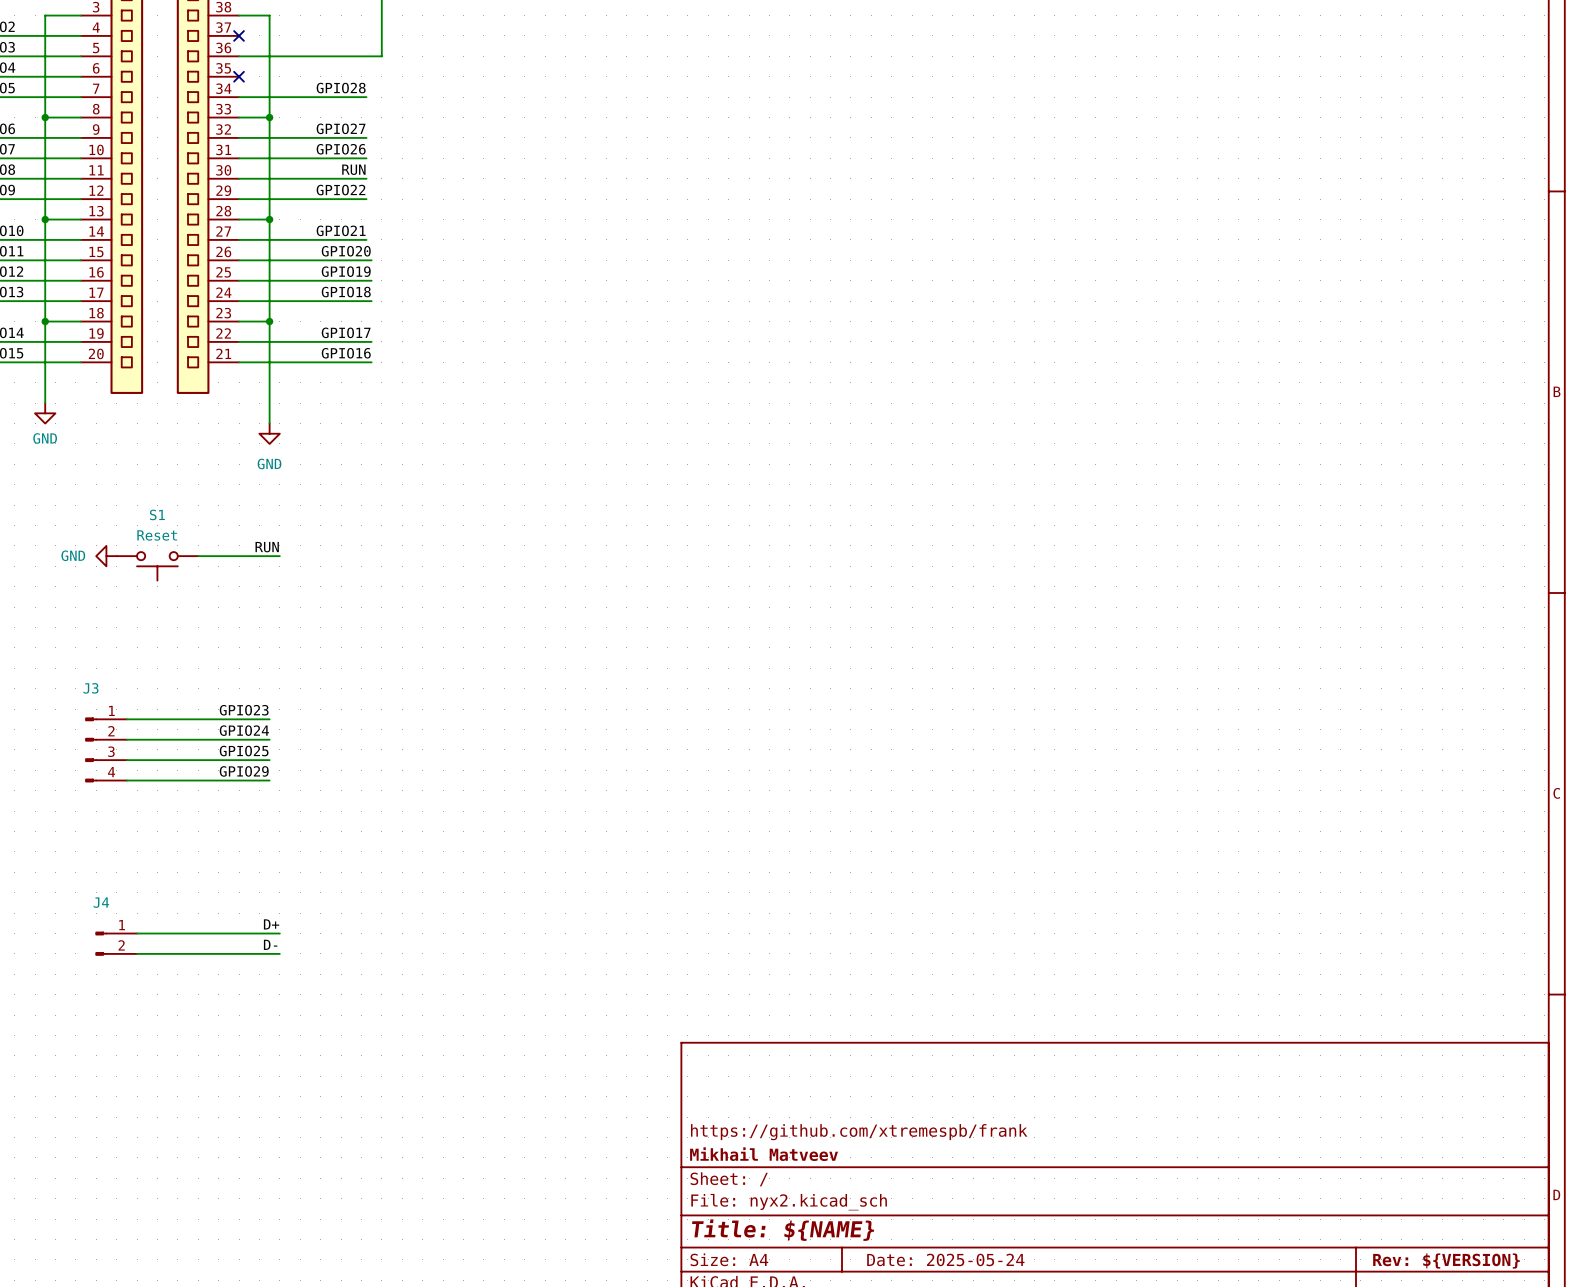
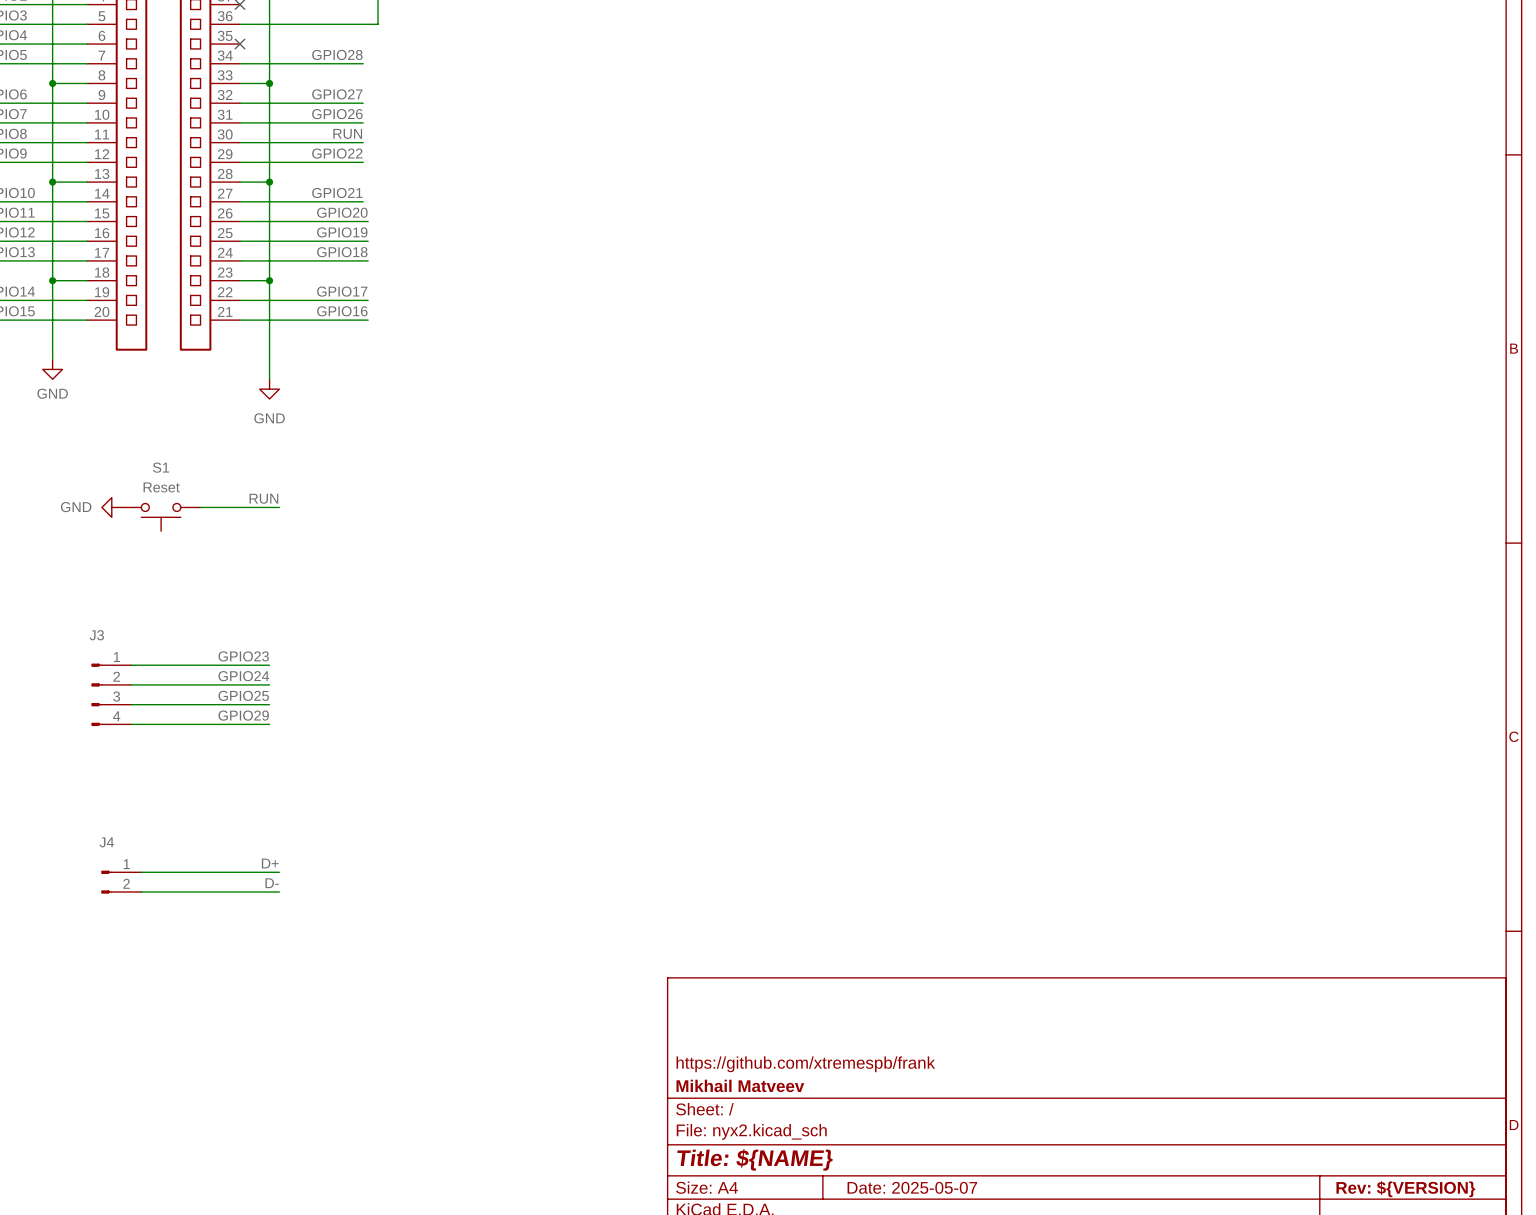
title block: Date: 2025-05-24 (945, 1259) -> Date: 2025-05-07 (912, 1187)

